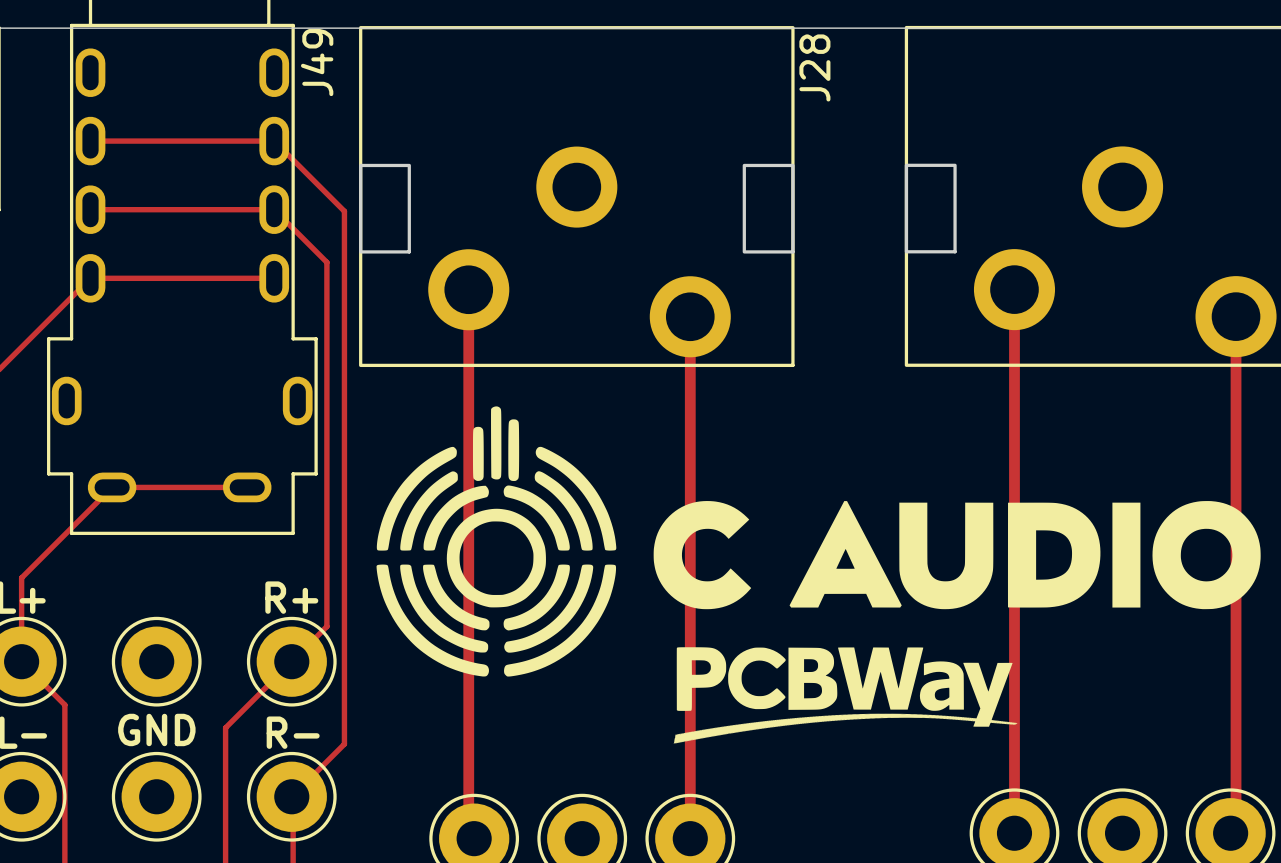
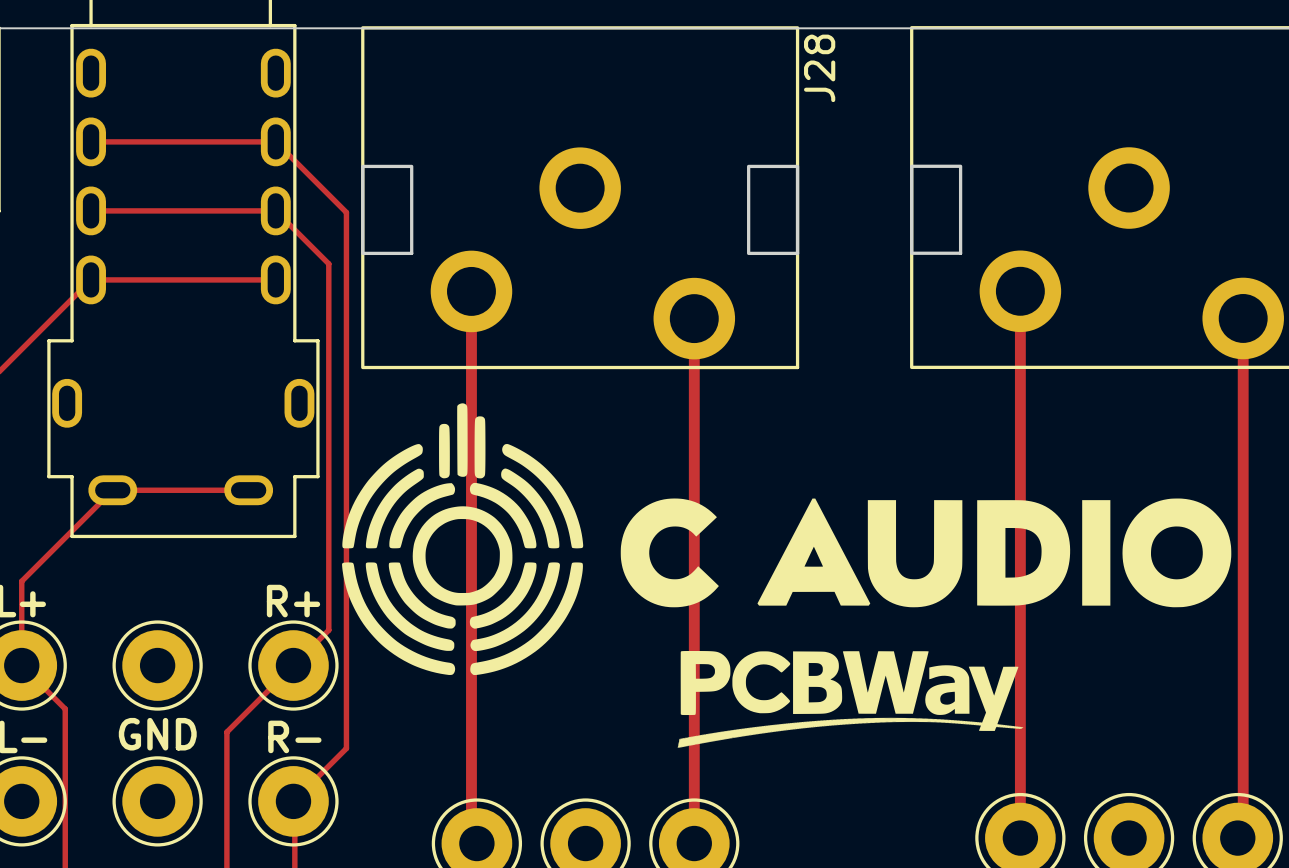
J49 name: J49 (317, 62) -> none
drawing position: (818, 541) -> (786, 539)

